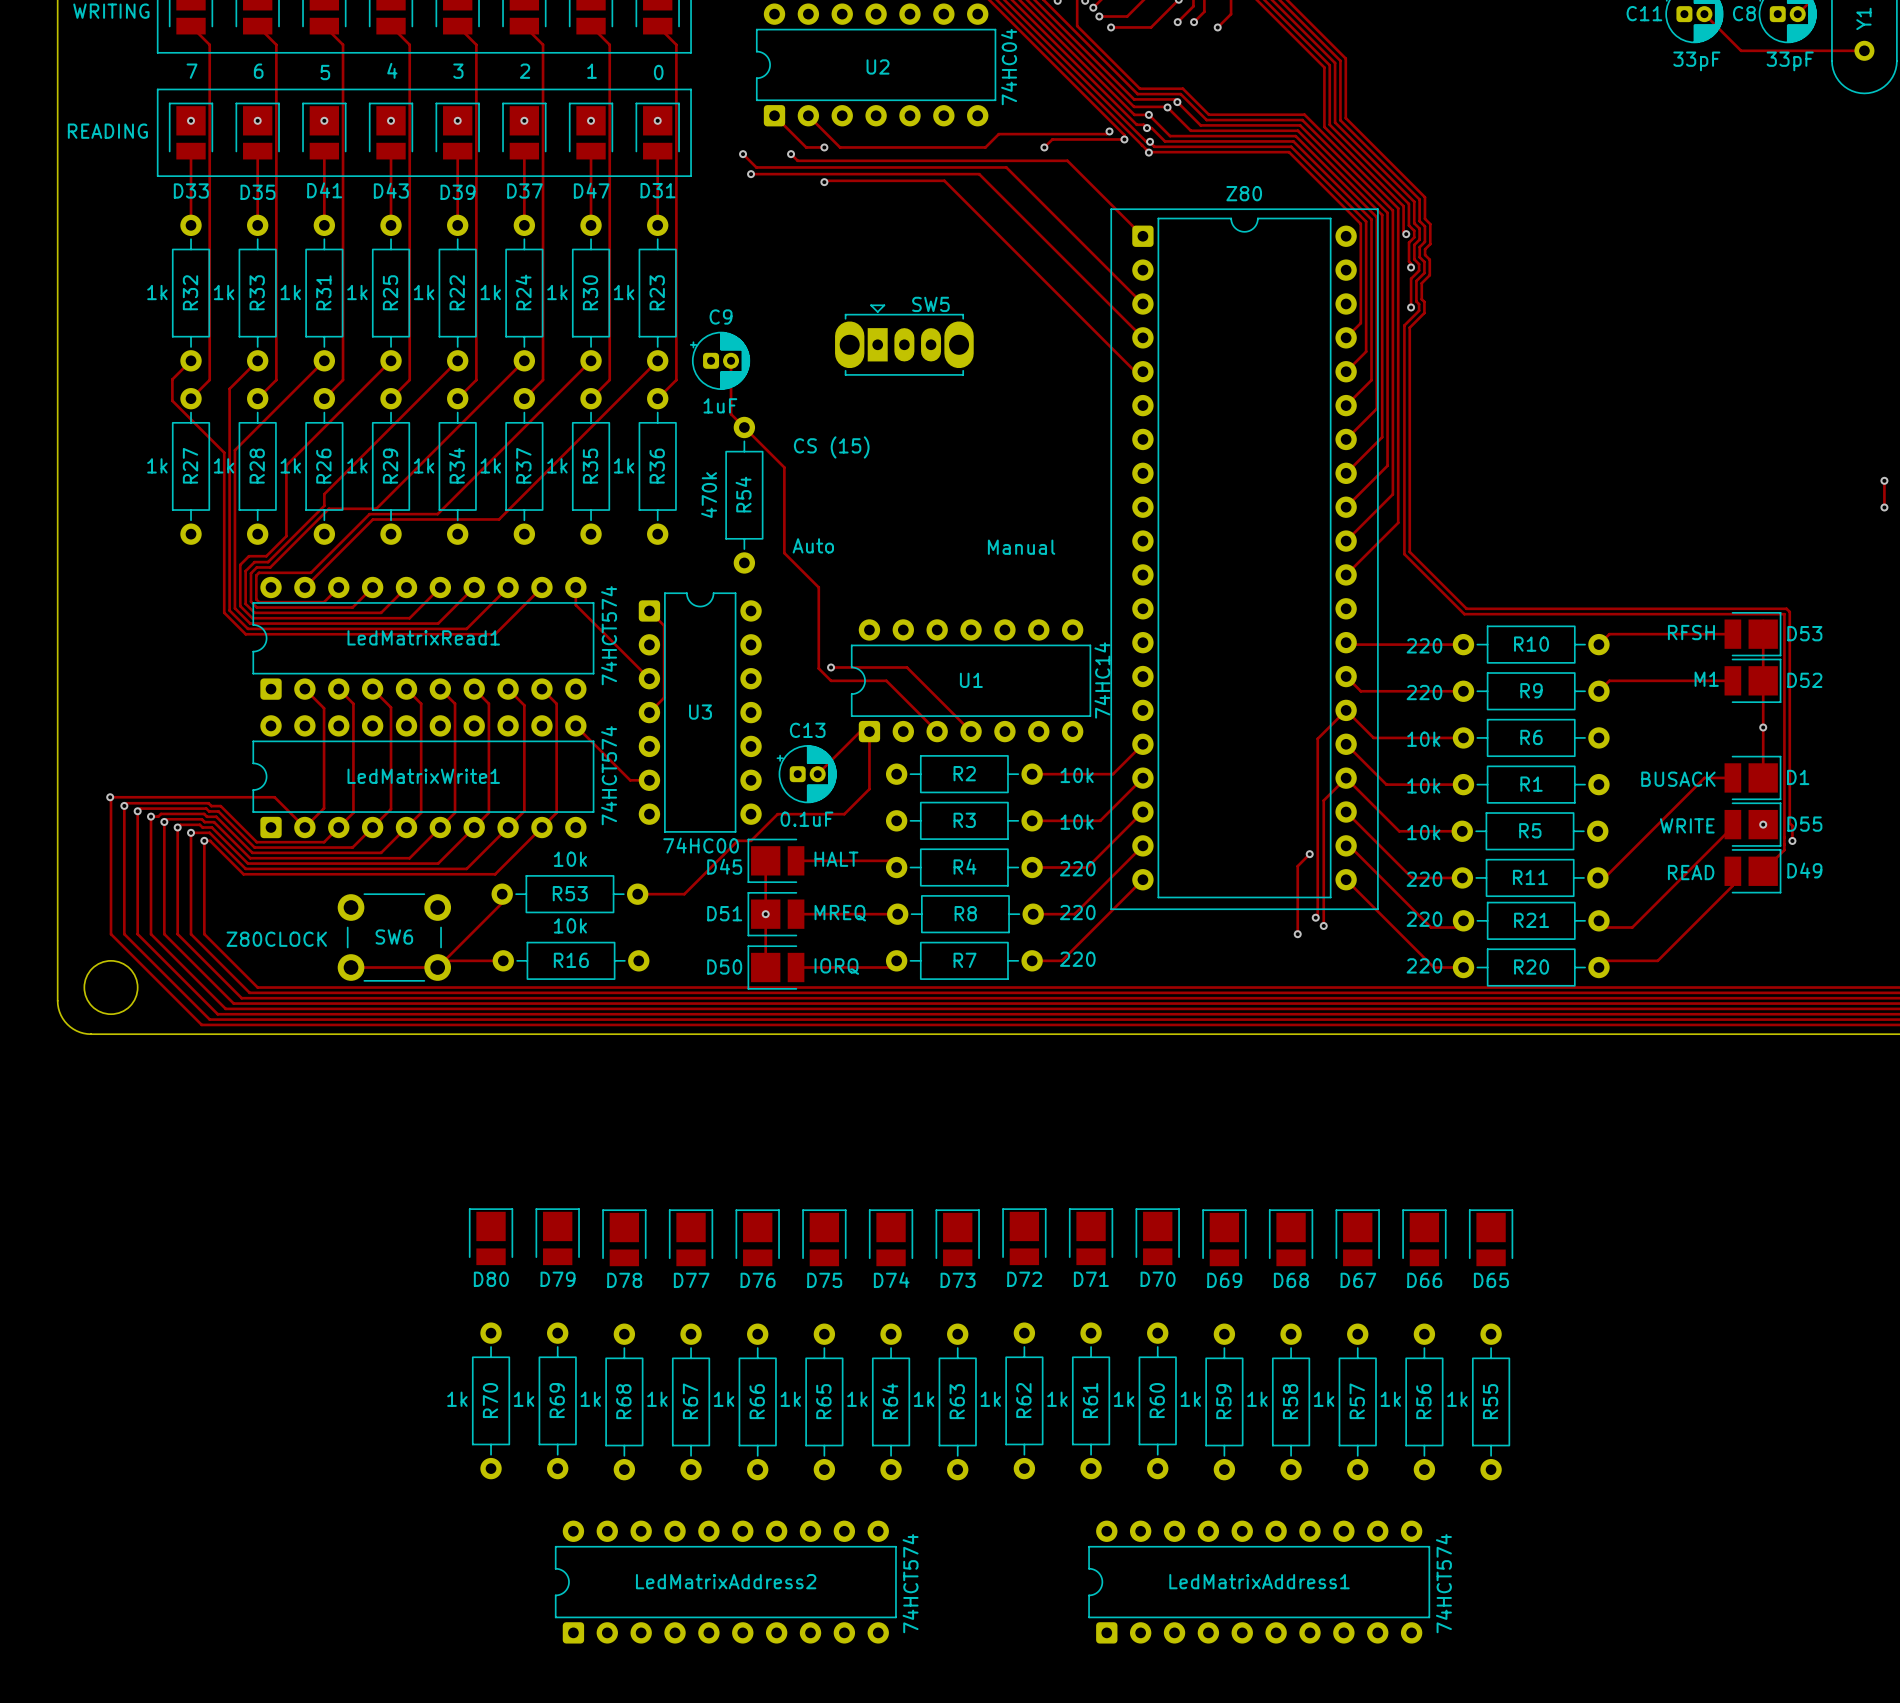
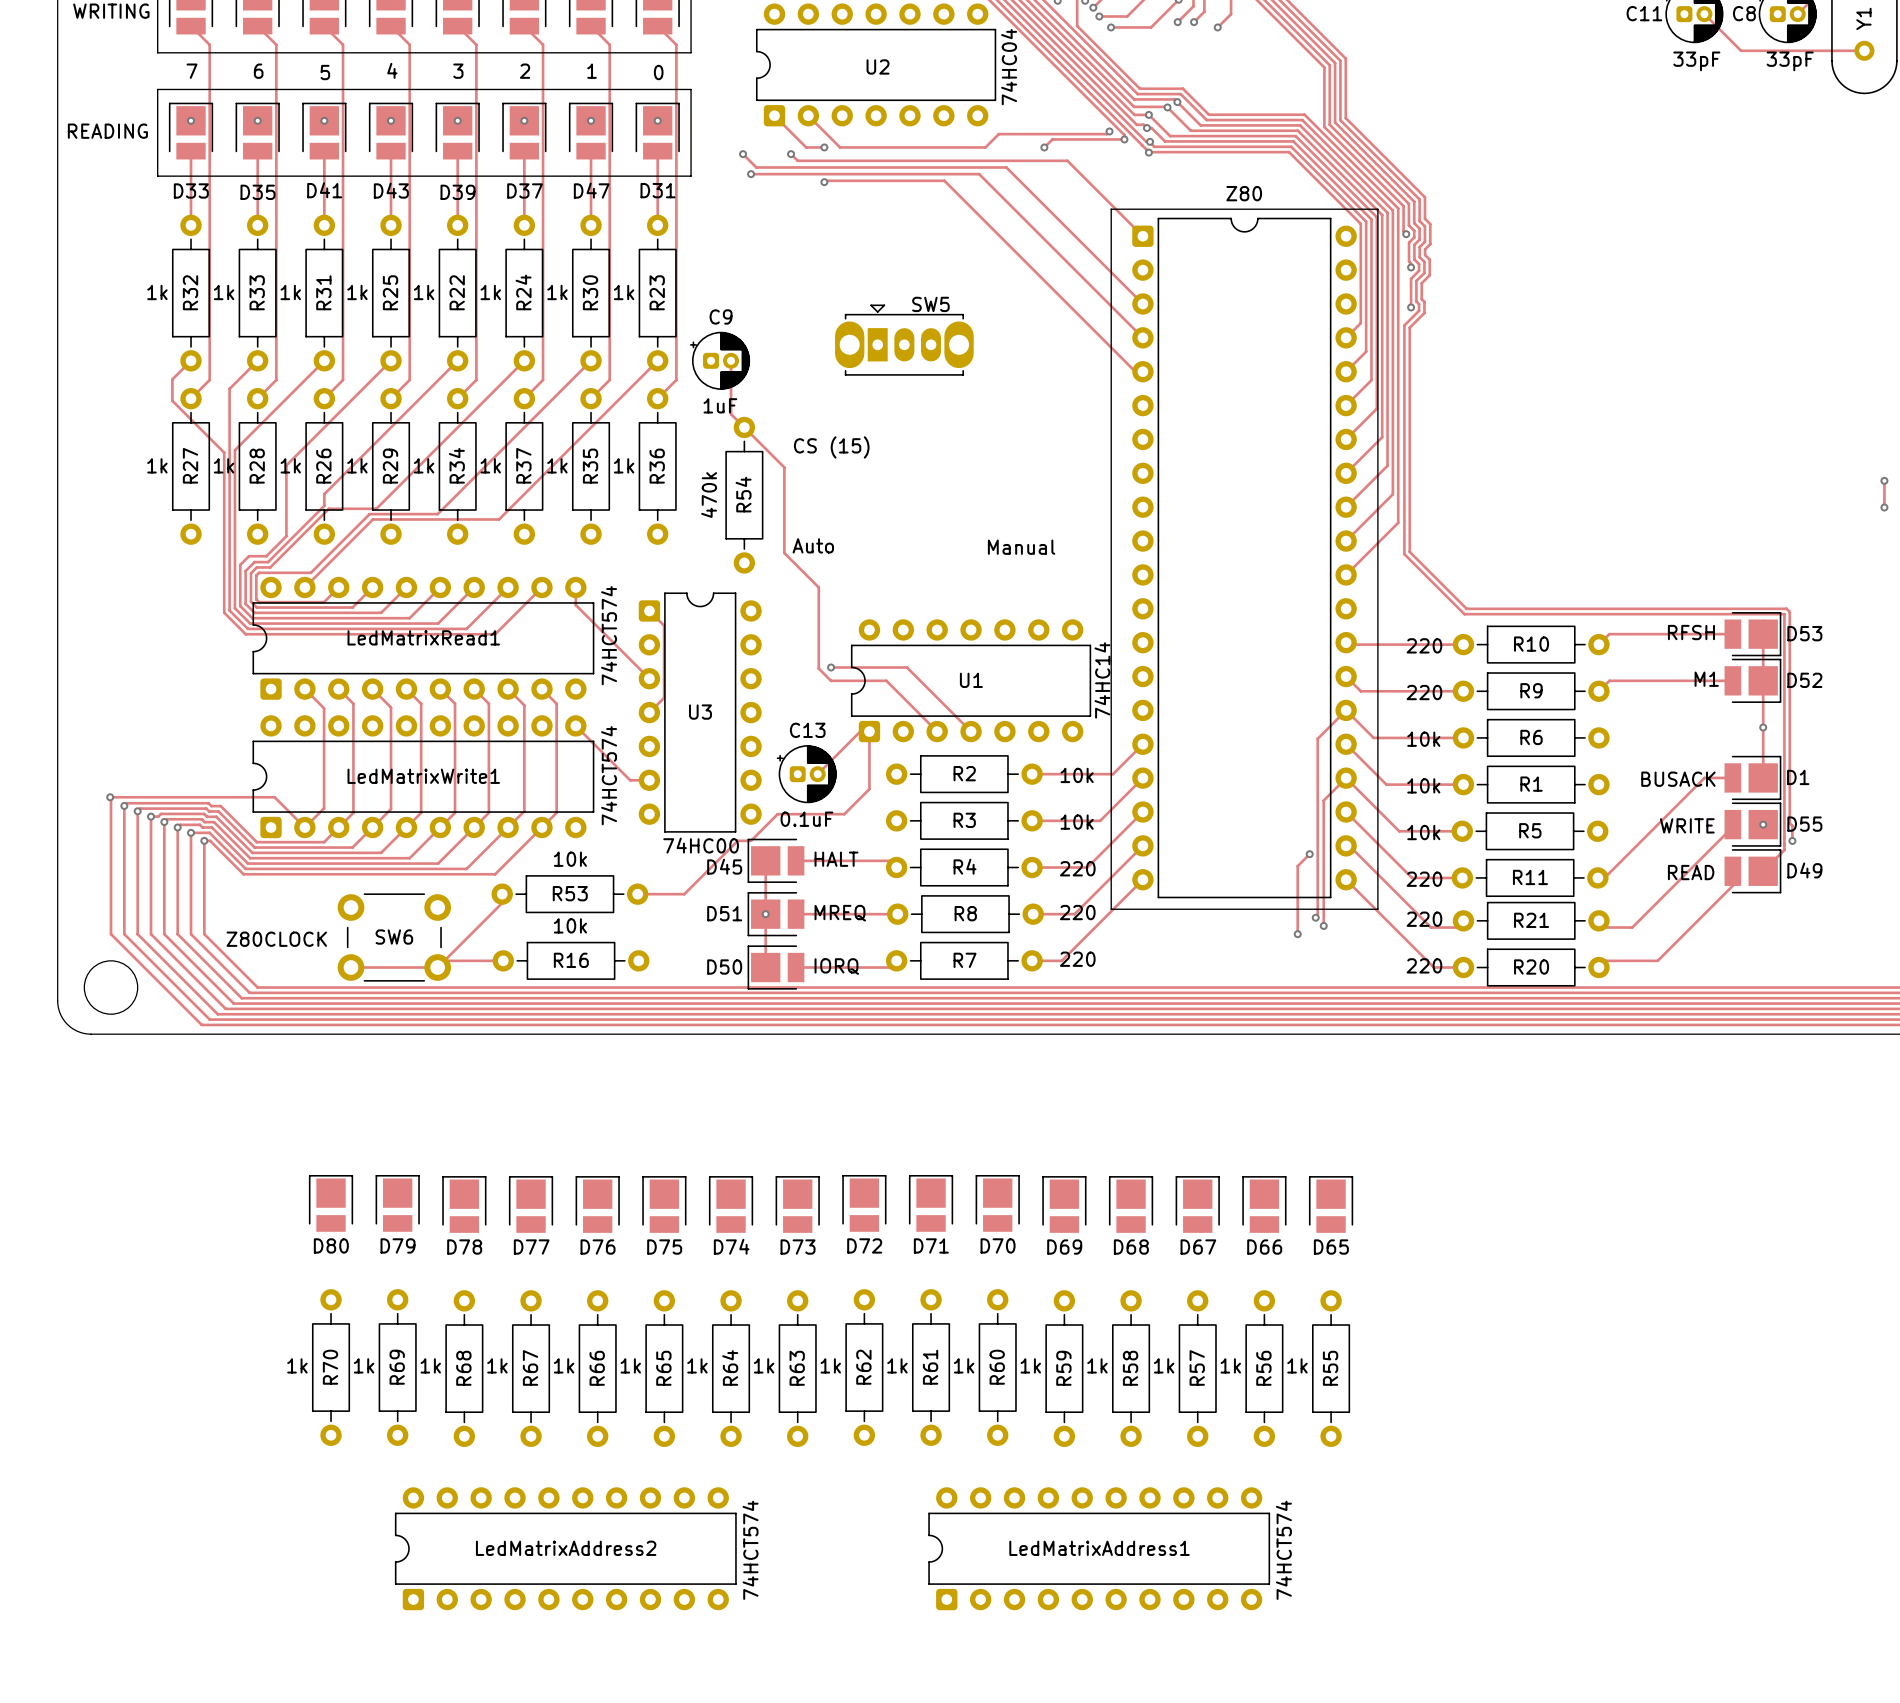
D80 position: (491, 1236) -> (331, 1203)
D79 position: (557, 1236) -> (397, 1203)
D72 position: (1024, 1236) -> (864, 1203)
D71 position: (1091, 1236) -> (931, 1203)
D70 position: (1157, 1236) -> (997, 1203)
D78 position: (624, 1237) -> (464, 1204)
D77 position: (691, 1237) -> (531, 1204)
D76 position: (757, 1237) -> (597, 1204)
D75 position: (824, 1237) -> (664, 1204)
D74 position: (891, 1237) -> (731, 1204)
D73 position: (957, 1237) -> (797, 1204)
D69 position: (1224, 1237) -> (1064, 1204)
D68 position: (1291, 1237) -> (1131, 1204)
D67 position: (1357, 1237) -> (1197, 1204)
D66 position: (1424, 1237) -> (1264, 1204)
D65 position: (1491, 1237) -> (1331, 1204)
text: none -> 1k (297, 1365)
text: none -> 1k (364, 1365)
text: none -> 1k (430, 1365)
text: none -> 1k (497, 1365)
text: none -> 1k (564, 1365)
text: none -> 1k (630, 1365)
text: none -> 1k (697, 1365)
text: none -> 1k (764, 1365)
text: none -> 1k (830, 1365)
text: none -> 1k (897, 1365)
text: none -> 1k (964, 1365)
text: none -> 1k (1030, 1365)
text: none -> 1k (1097, 1365)
text: none -> 1k (1164, 1365)
text: none -> 1k (1230, 1365)
text: none -> 1k (1297, 1365)
text: 1k (457, 1399) -> none
text: 1k (524, 1399) -> none
text: 1k (590, 1399) -> none
text: 1k (657, 1399) -> none
text: 1k (724, 1399) -> none
text: 1k (790, 1399) -> none
text: 1k (857, 1399) -> none
text: 1k (924, 1399) -> none
text: 1k (990, 1399) -> none
text: 1k (1057, 1399) -> none
text: 1k (1124, 1399) -> none
text: 1k (1190, 1399) -> none
text: 1k (1257, 1399) -> none
text: 1k (1324, 1399) -> none
text: 1k (1390, 1399) -> none
text: 1k (1457, 1399) -> none
R70 position: (491, 1400) -> (331, 1367)
R69 position: (557, 1400) -> (397, 1367)
R62 position: (1024, 1400) -> (864, 1367)
R61 position: (1091, 1400) -> (931, 1367)
R60 position: (1157, 1400) -> (997, 1367)
R68 position: (624, 1401) -> (464, 1368)
R67 position: (691, 1401) -> (531, 1368)
R66 position: (757, 1401) -> (597, 1368)
R65 position: (824, 1401) -> (664, 1368)
R64 position: (891, 1401) -> (731, 1368)
R63 position: (957, 1401) -> (797, 1368)
R59 position: (1224, 1401) -> (1064, 1368)
R58 position: (1291, 1401) -> (1131, 1368)
R57 position: (1357, 1401) -> (1197, 1368)
R56 position: (1424, 1401) -> (1264, 1368)
R55 position: (1491, 1401) -> (1331, 1368)
LedMatrixAddress2 position: (725, 1582) -> (565, 1548)
LedMatrixAddress1 position: (1259, 1582) -> (1099, 1548)
text position: 74HCT574 (910, 1583) -> 74HCT574 (750, 1550)
text position: 74HCT574 (1443, 1583) -> 74HCT574 (1283, 1550)

